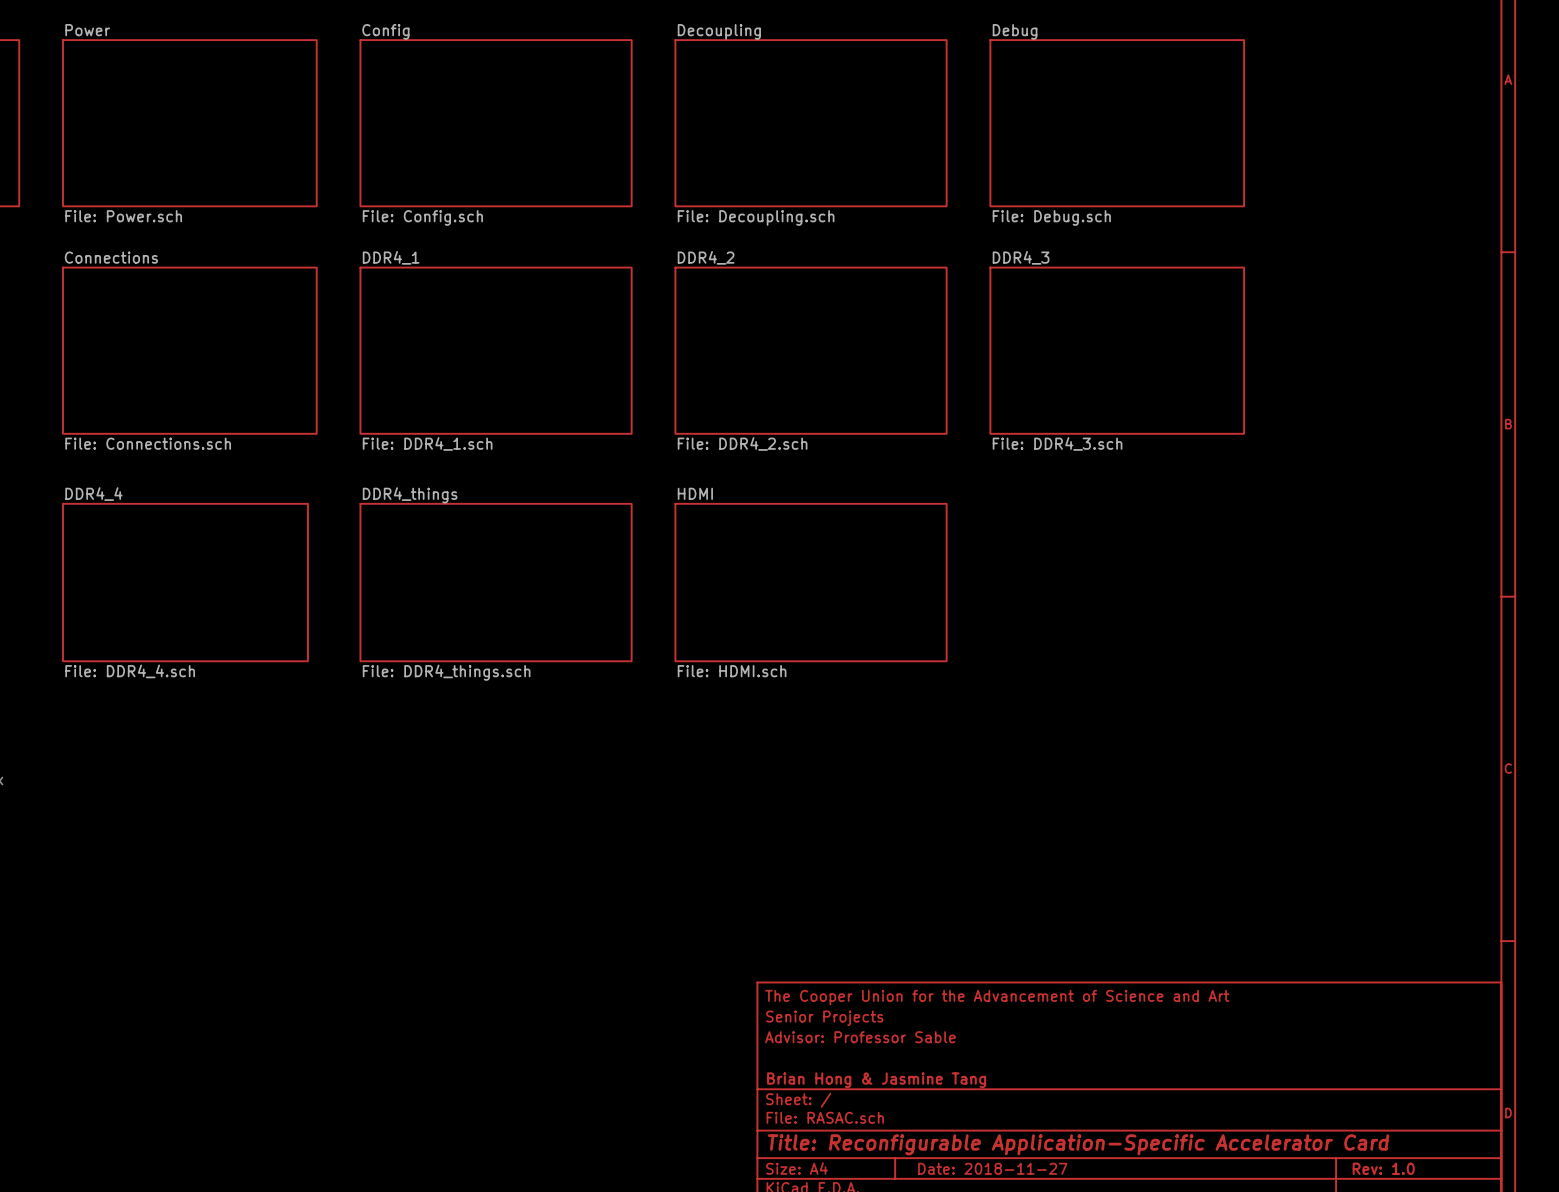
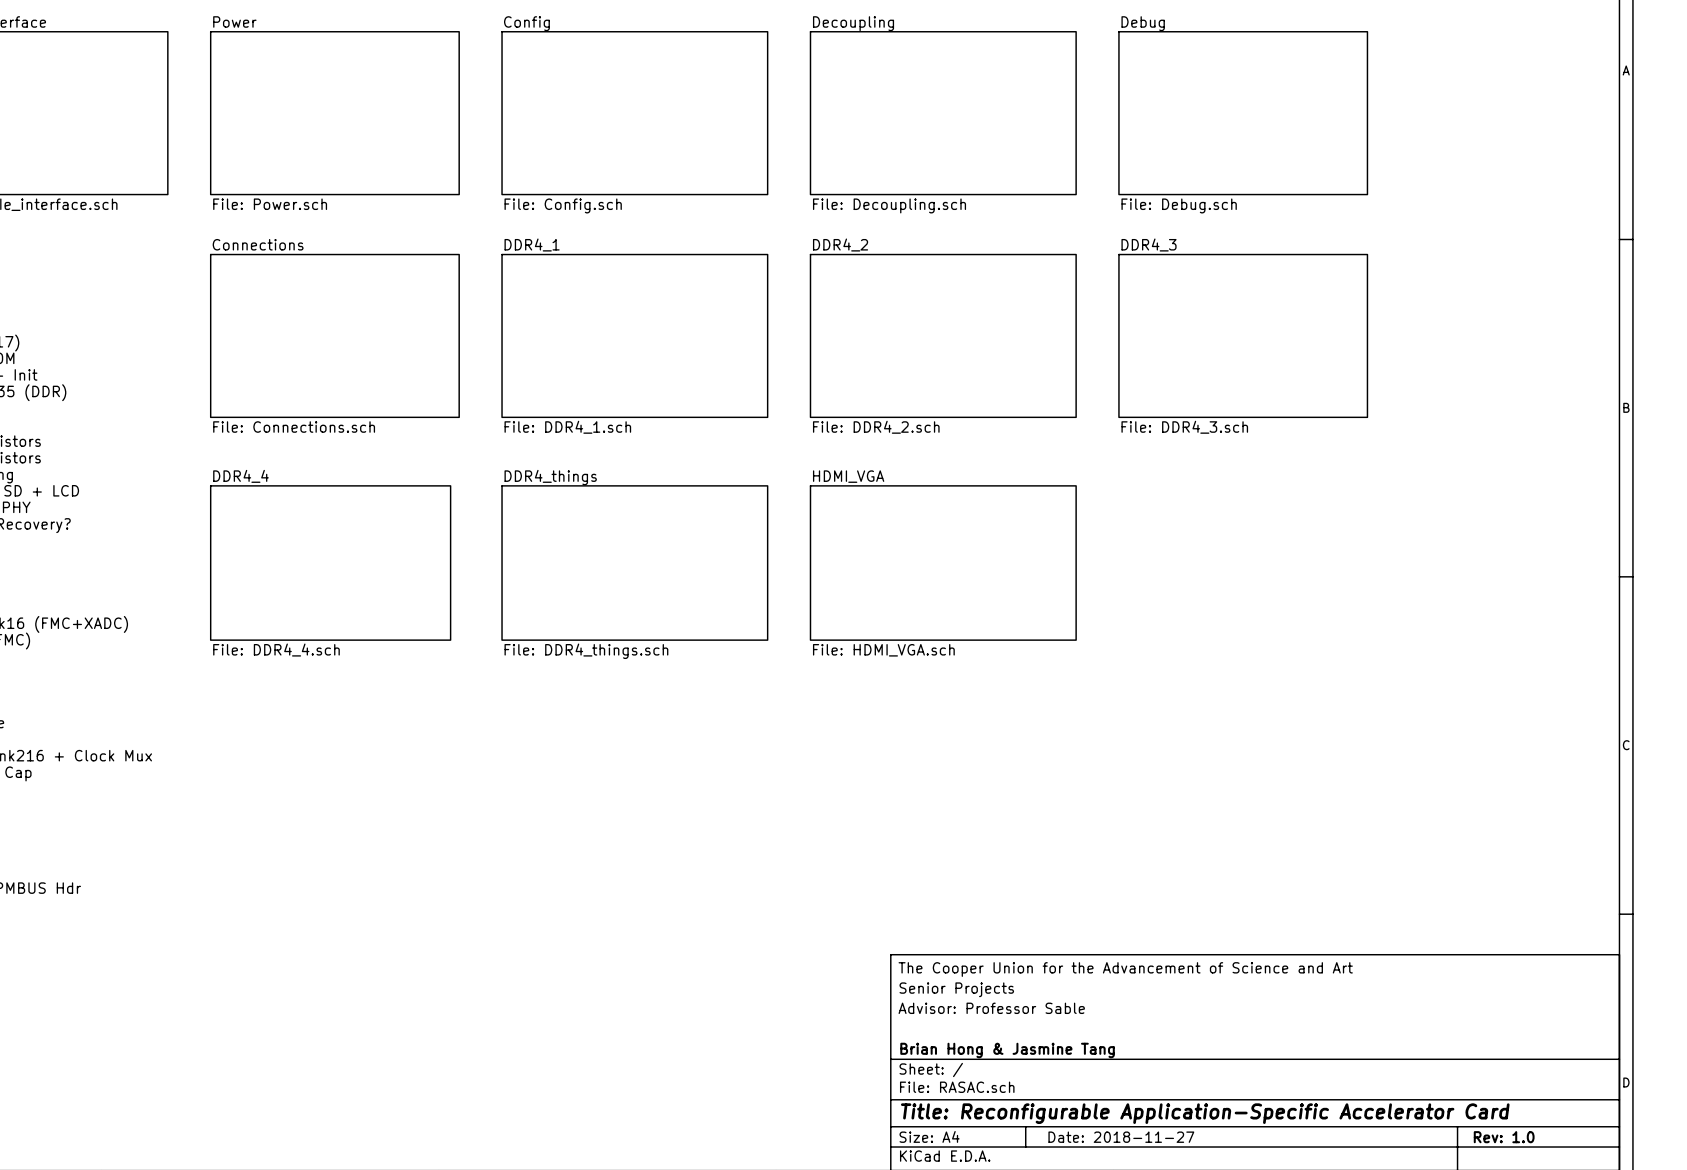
sheet HDMI name: HDMI (695, 493) -> HDMI_VGA (848, 476)
sheet HDMI value: File: HDMI.sch (732, 671) -> File: HDMI_VGA.sch (883, 650)

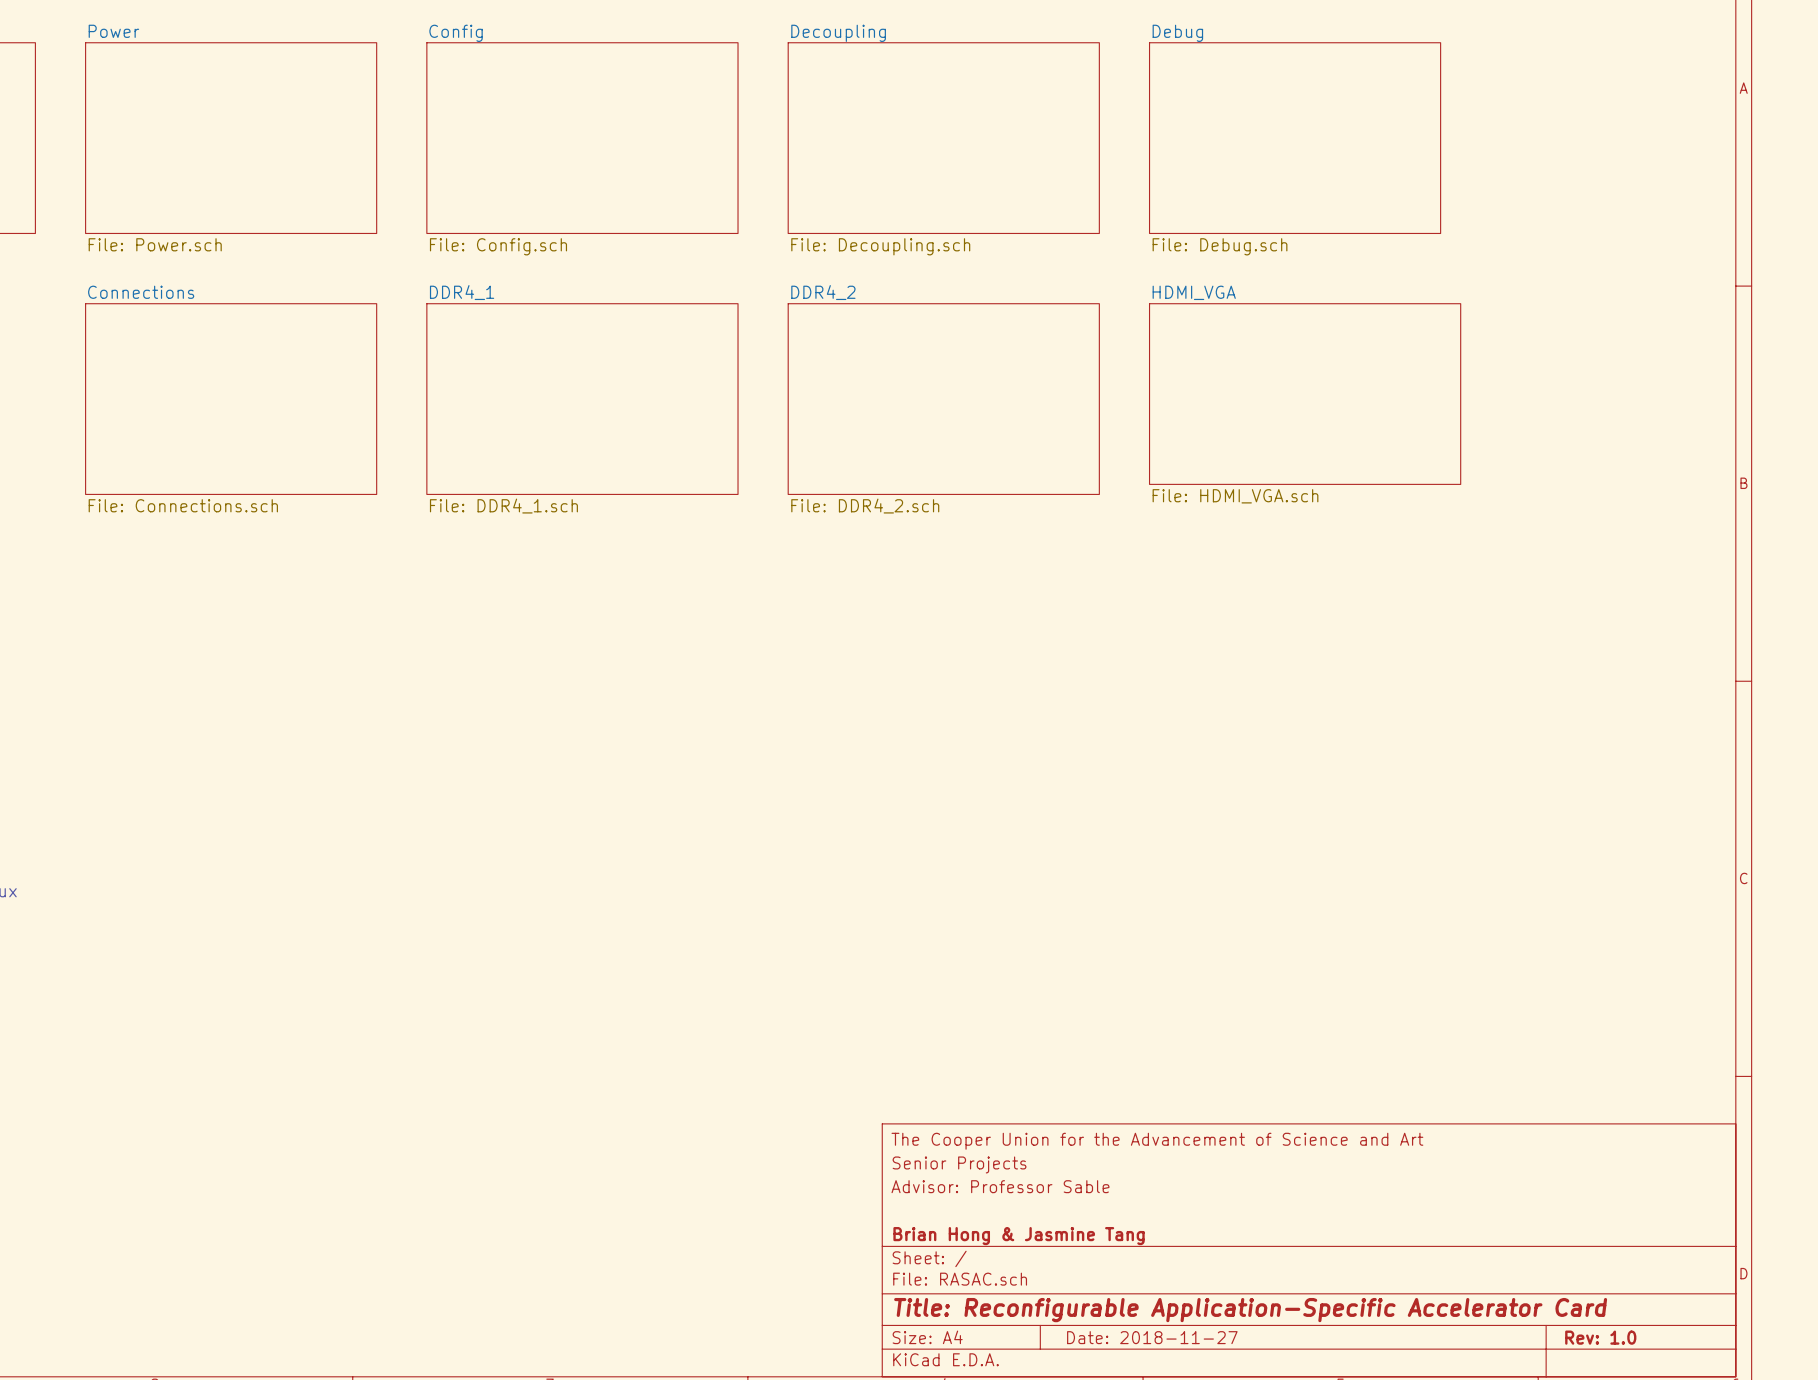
sheet HDMI_VGA: none -> File: HDMI_VGA.sch (1305, 394)
sheet DDR4_3: File: DDR4_3.sch (1243, 335) -> none
sheet DDR4_4: File: DDR4_4.sch (330, 563) -> none
sheet DDR4_things: File: DDR4_things.sch (634, 563) -> none
sheet HDMI_VGA: File: HDMI_VGA.sch (943, 563) -> none

